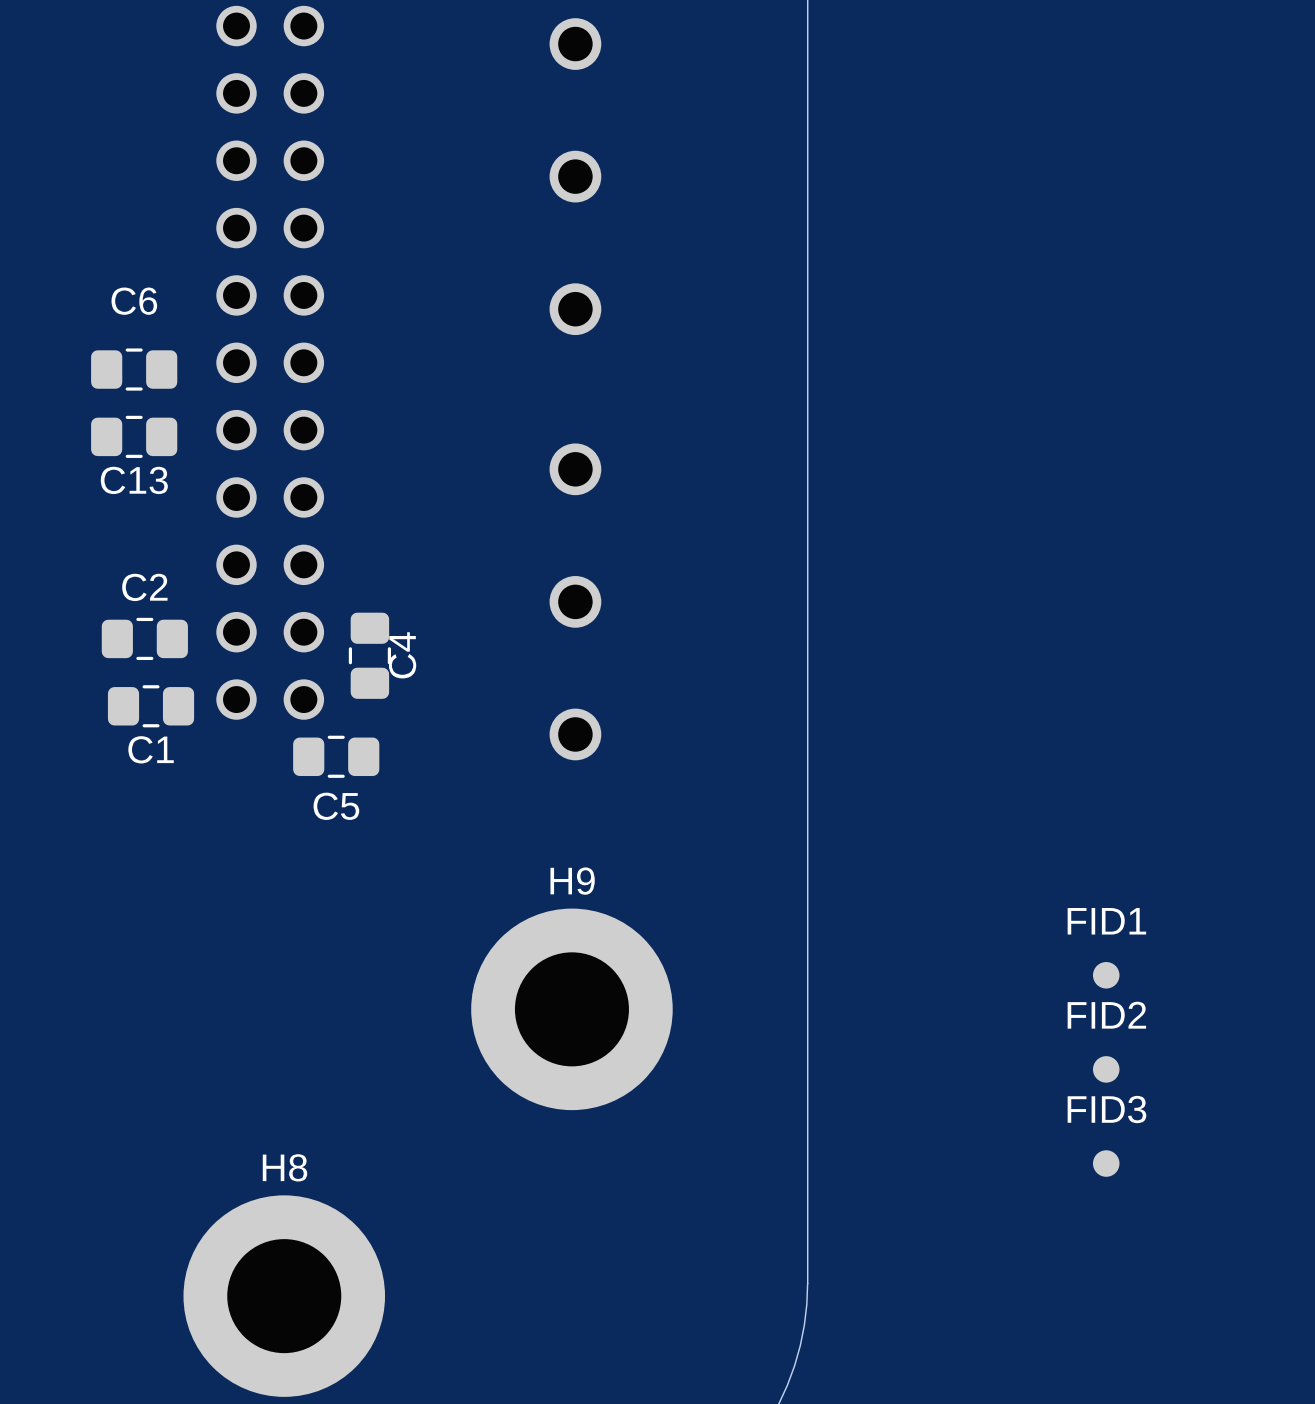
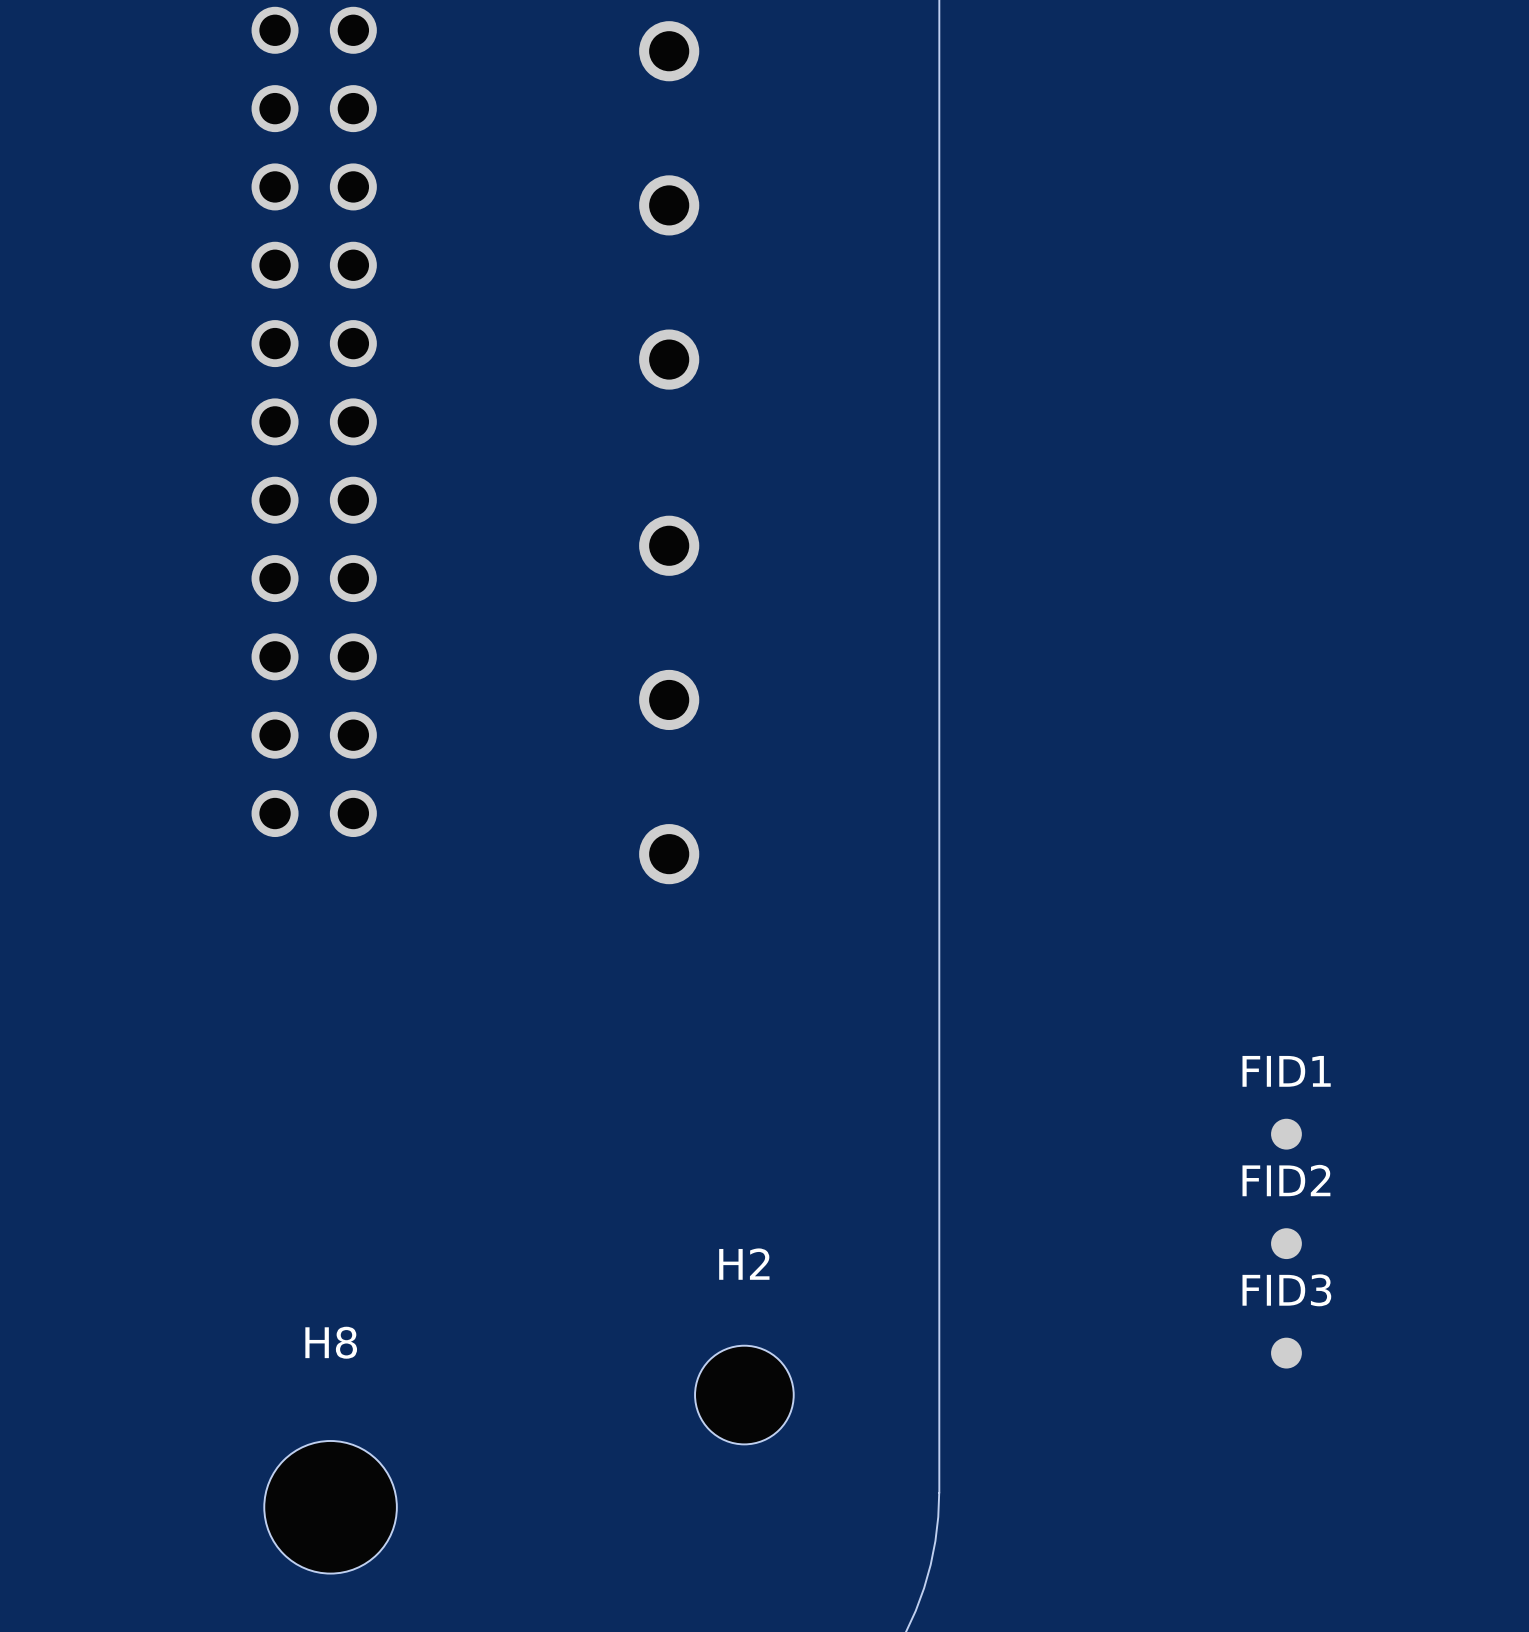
C6: (134, 369) -> none
C13: (134, 436) -> none
C2: (144, 638) -> none
C4: (369, 655) -> none
C1: (151, 706) -> none
C5: (336, 756) -> none
H9: (571, 1009) -> none
H8 footprint: [183, 1195, 386, 1397] -> [264, 1440, 397, 1574]
H2: none -> (744, 1395)

